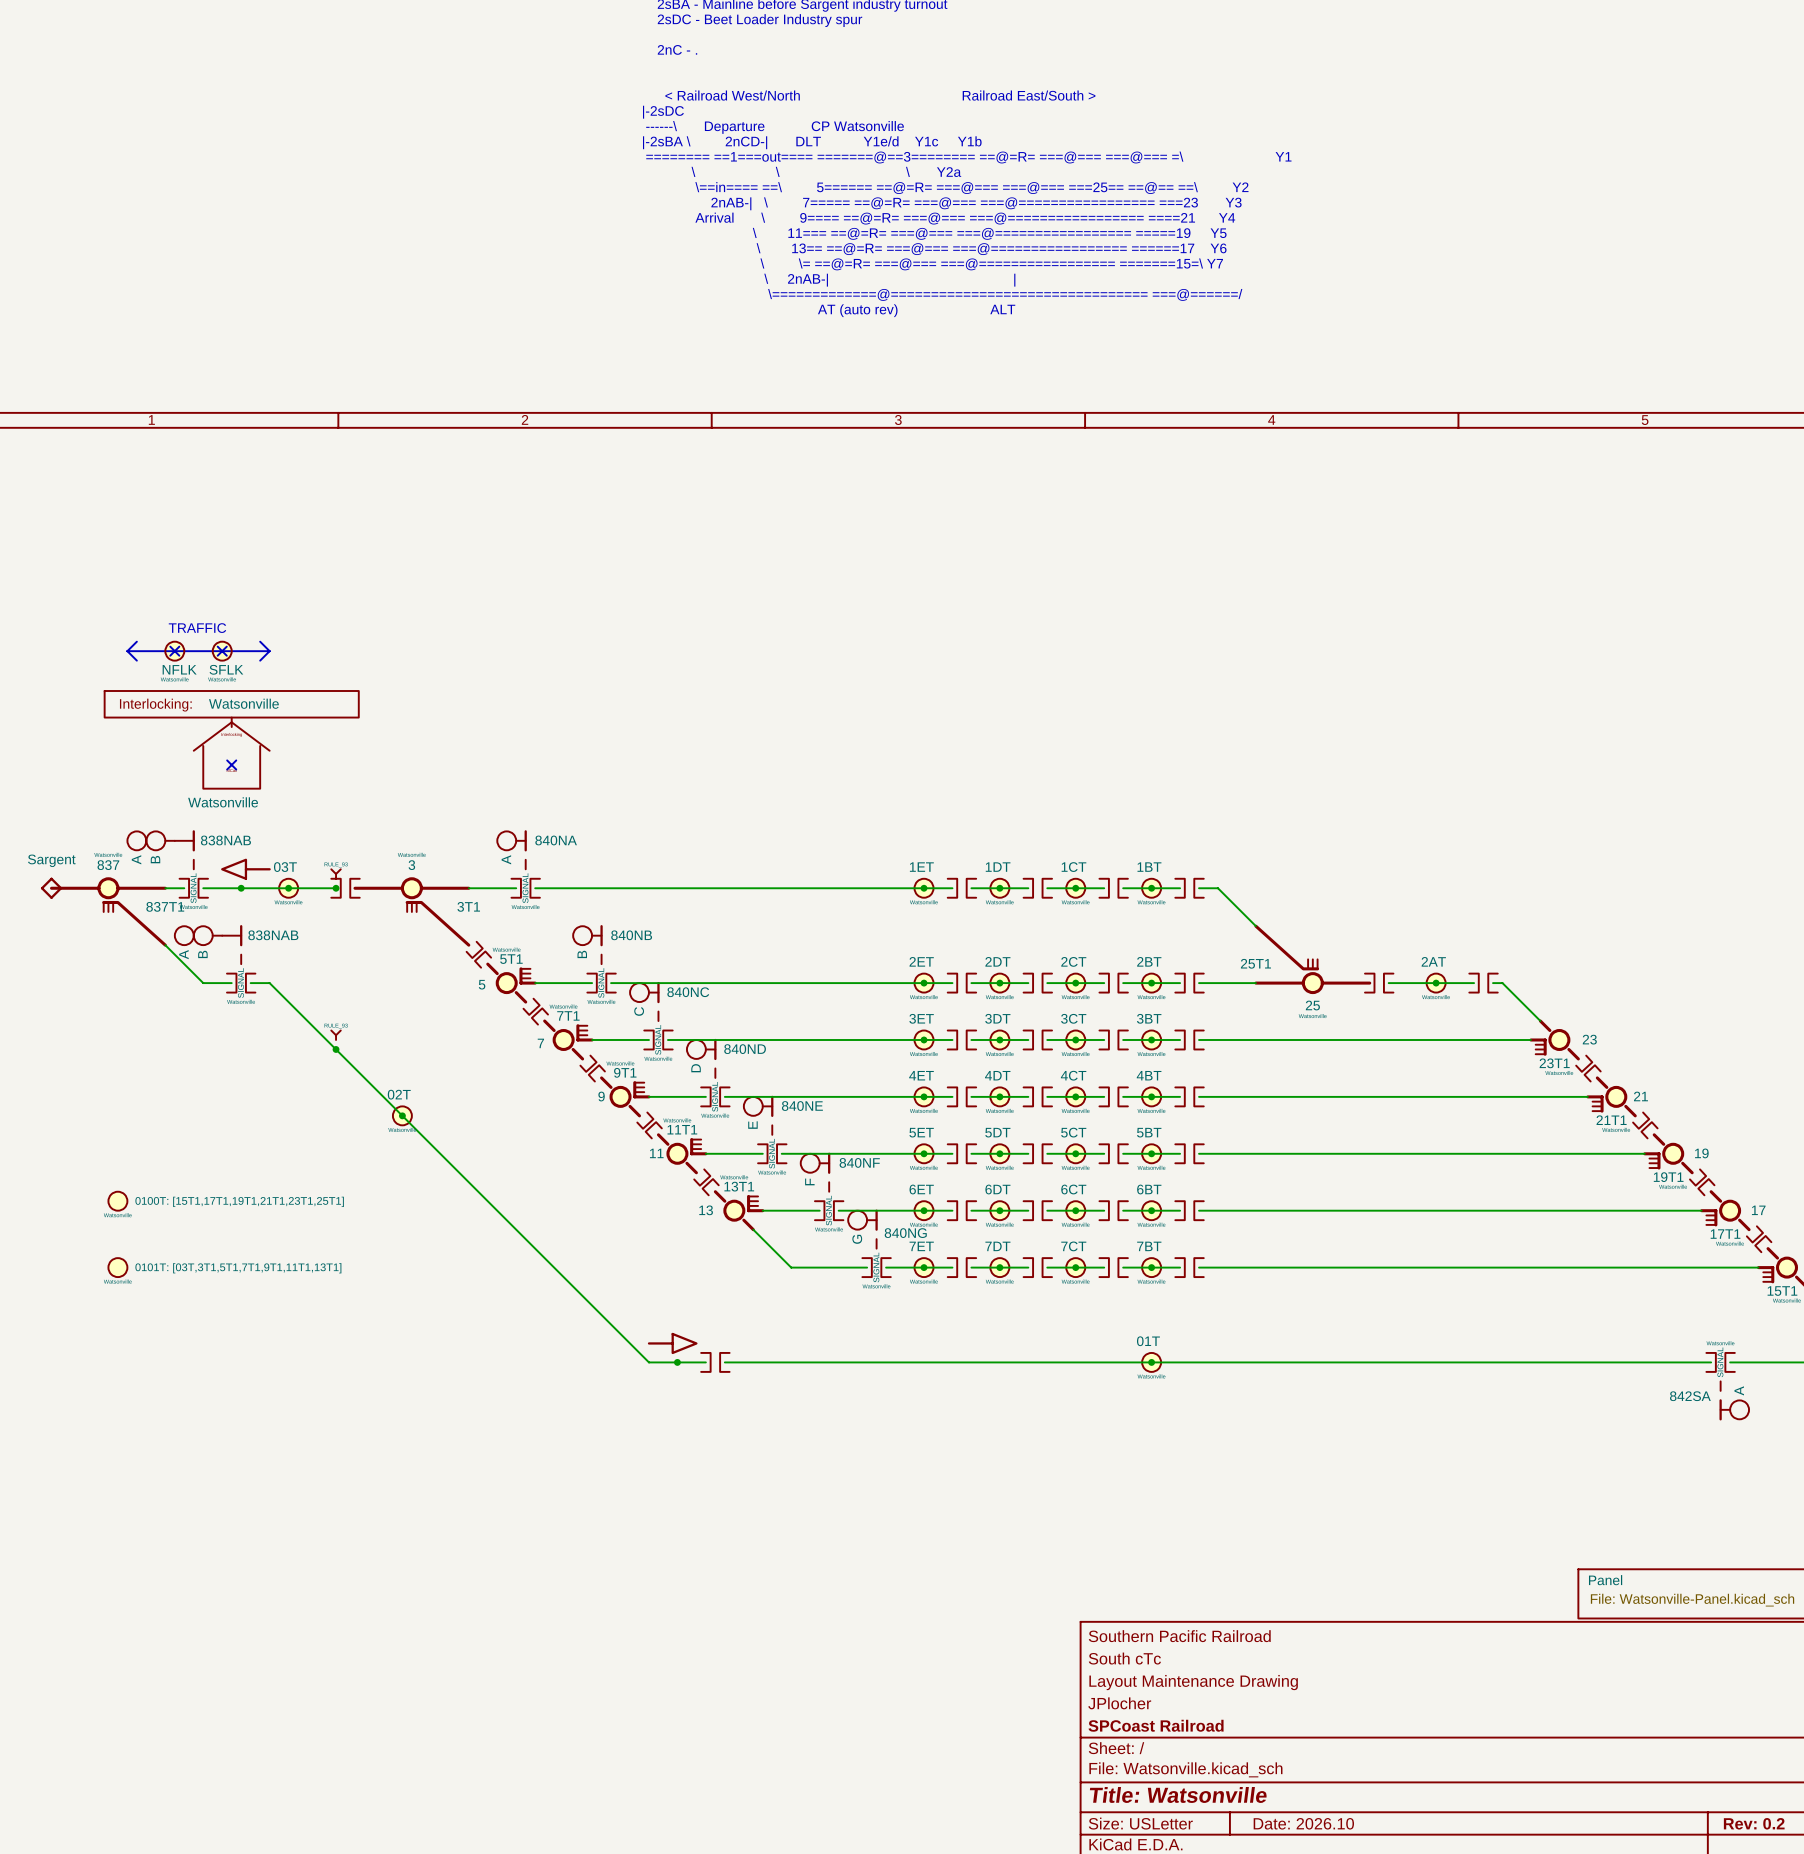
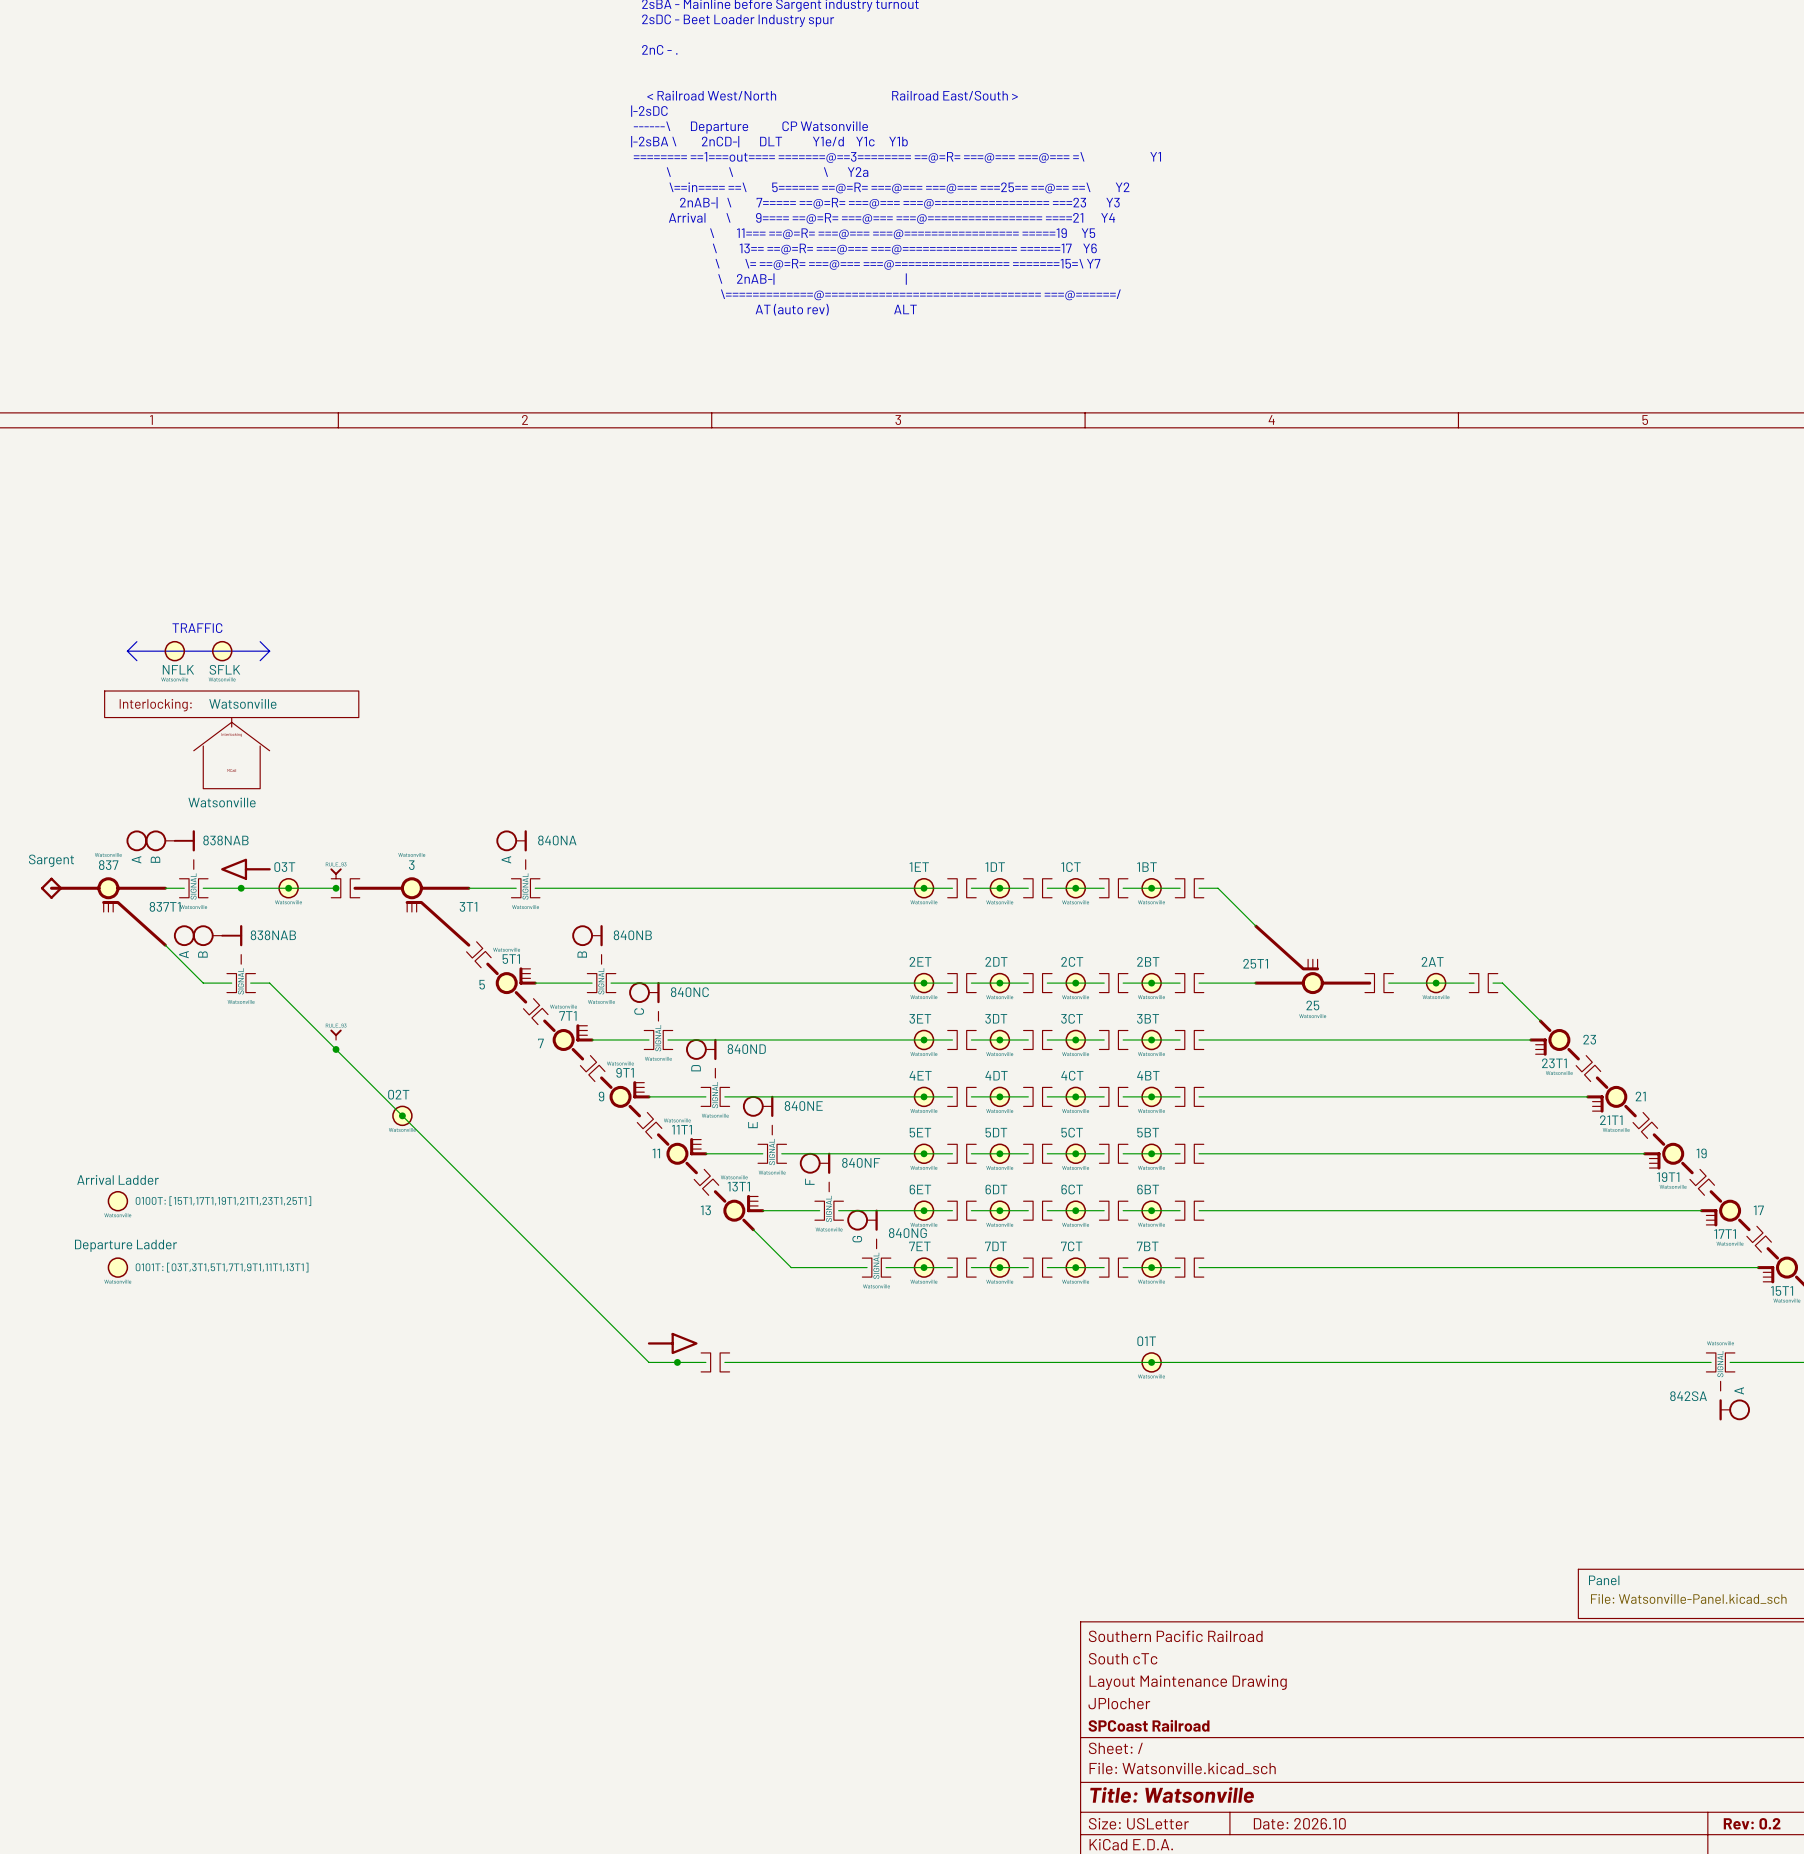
no-connect mark: (174, 651) -> none
no-connect mark: (222, 651) -> none
no-connect mark: (231, 764) -> none
part text: none -> Arrival Ladder (118, 1179)
part text: none -> Departure Ladder (126, 1245)

